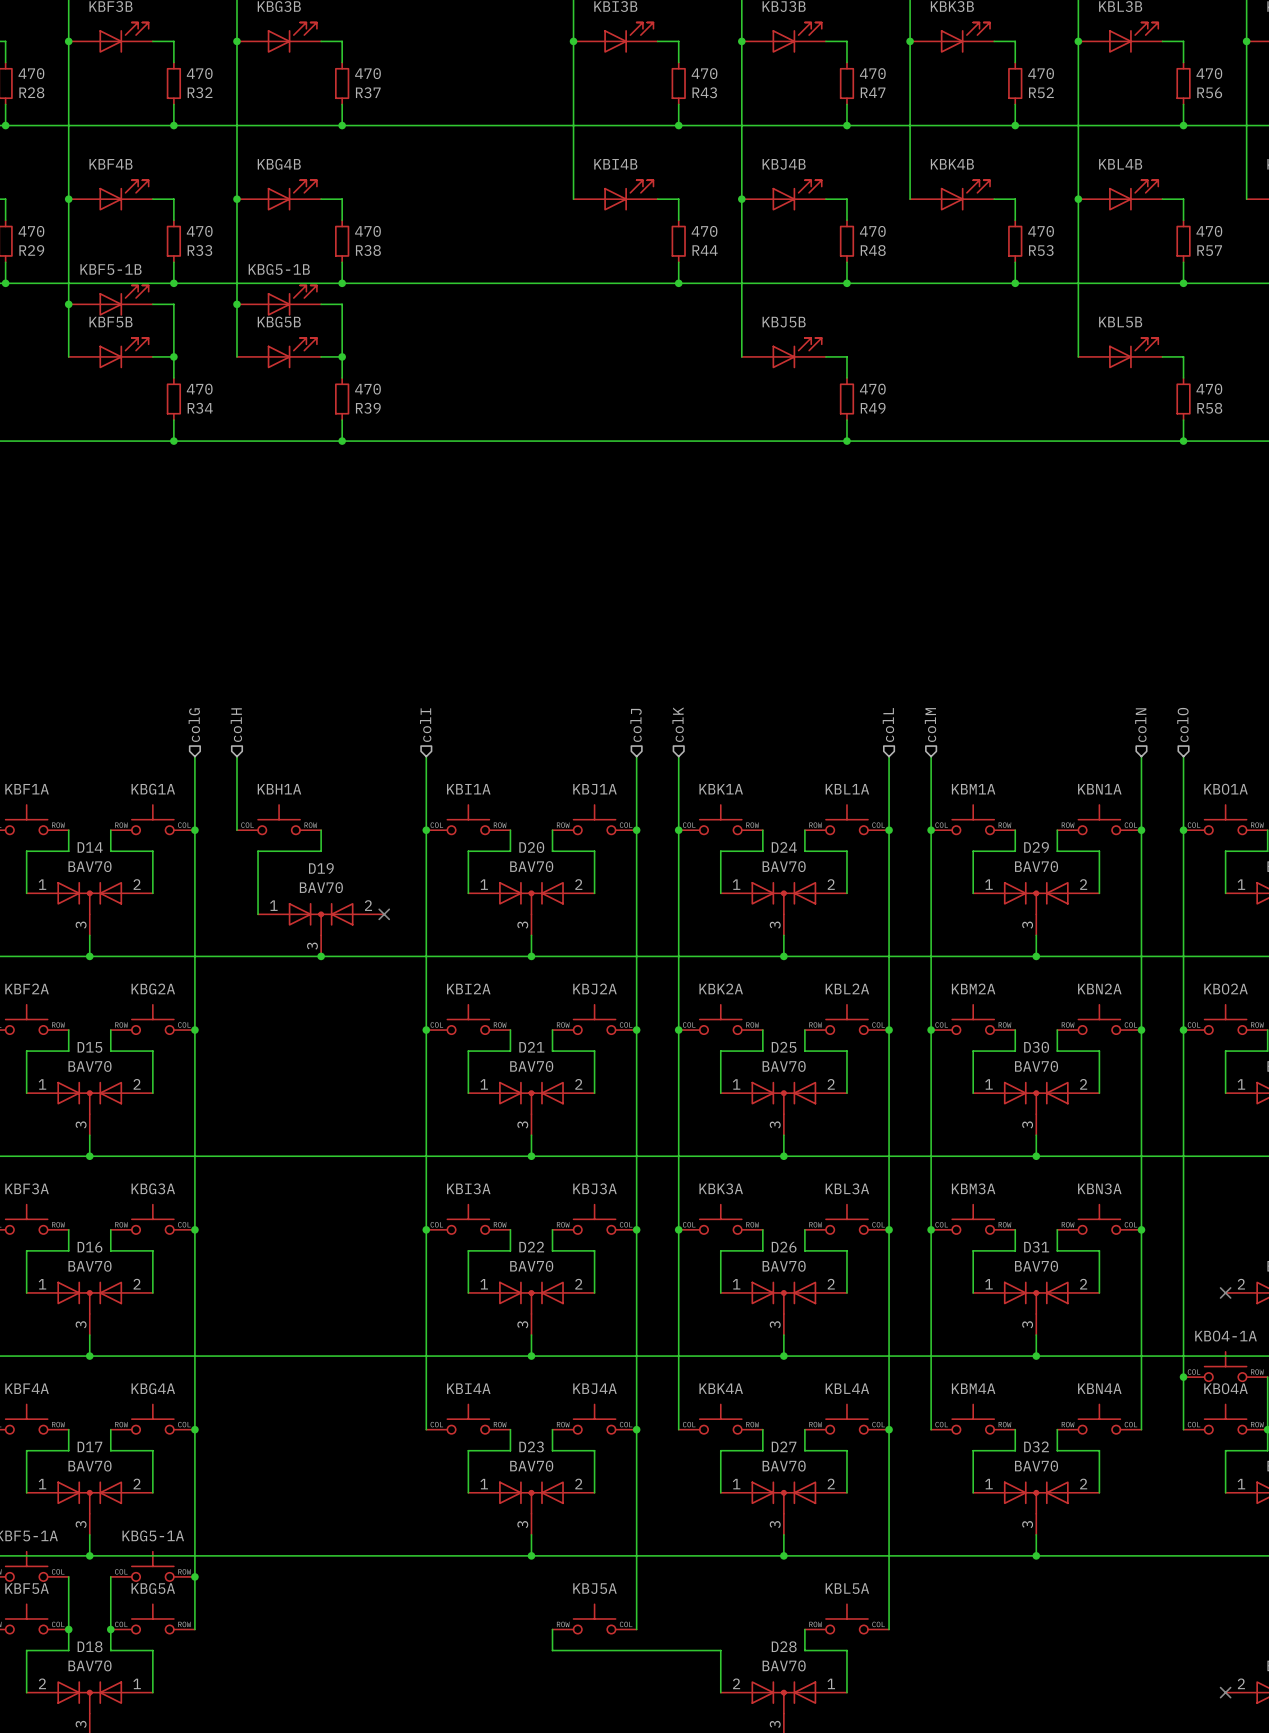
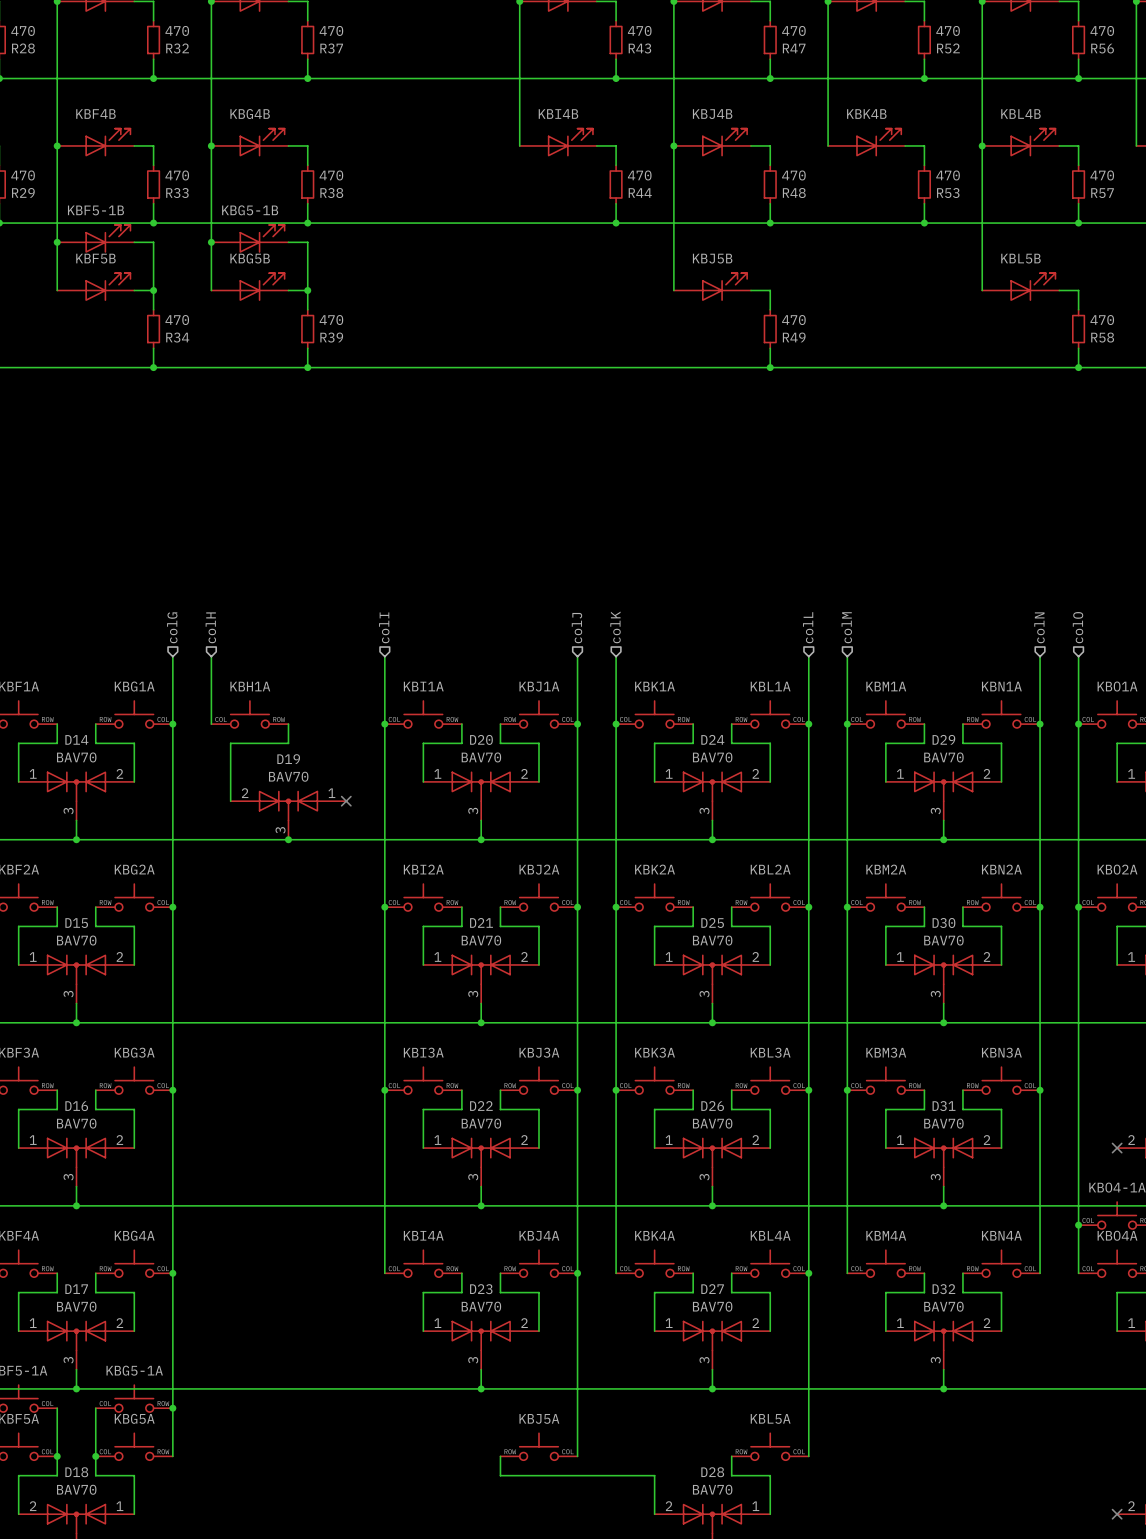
D19 flip: as is (321, 919) -> left-right (288, 805)

